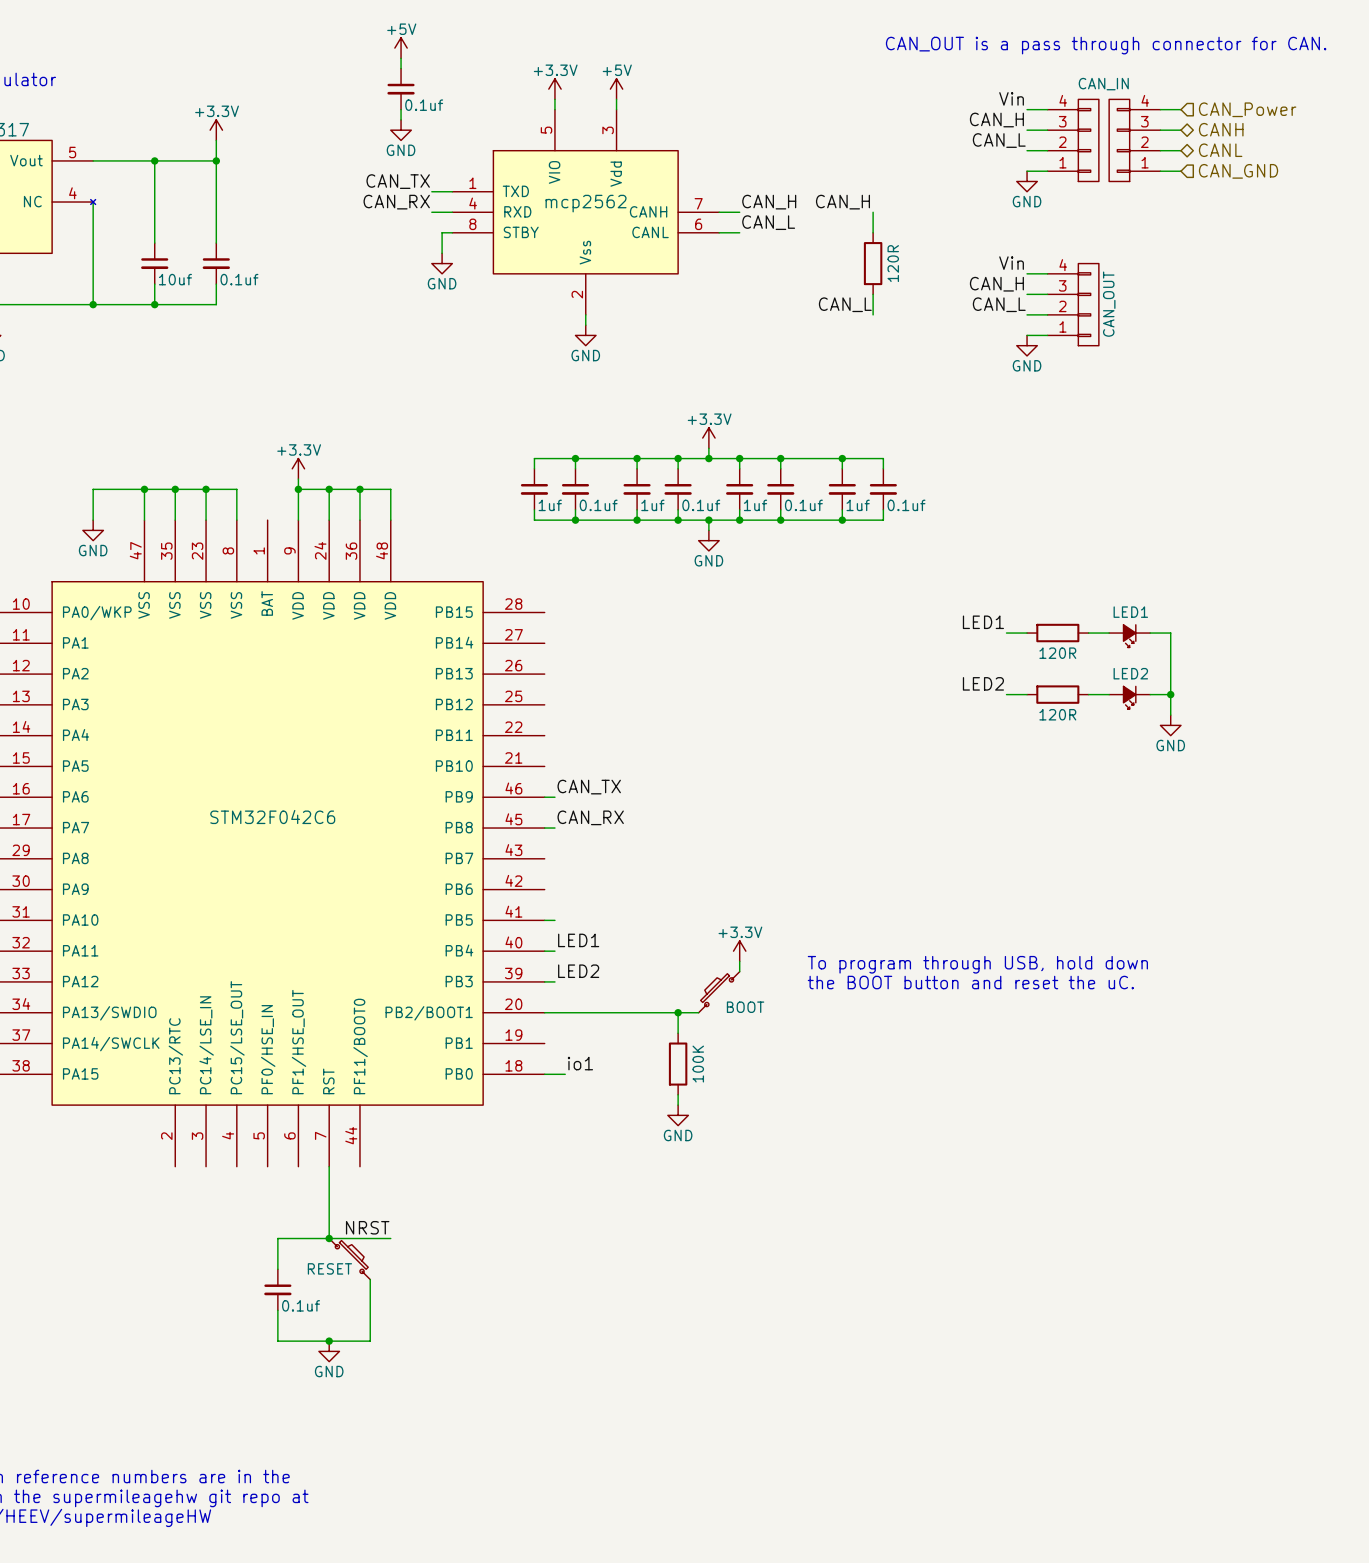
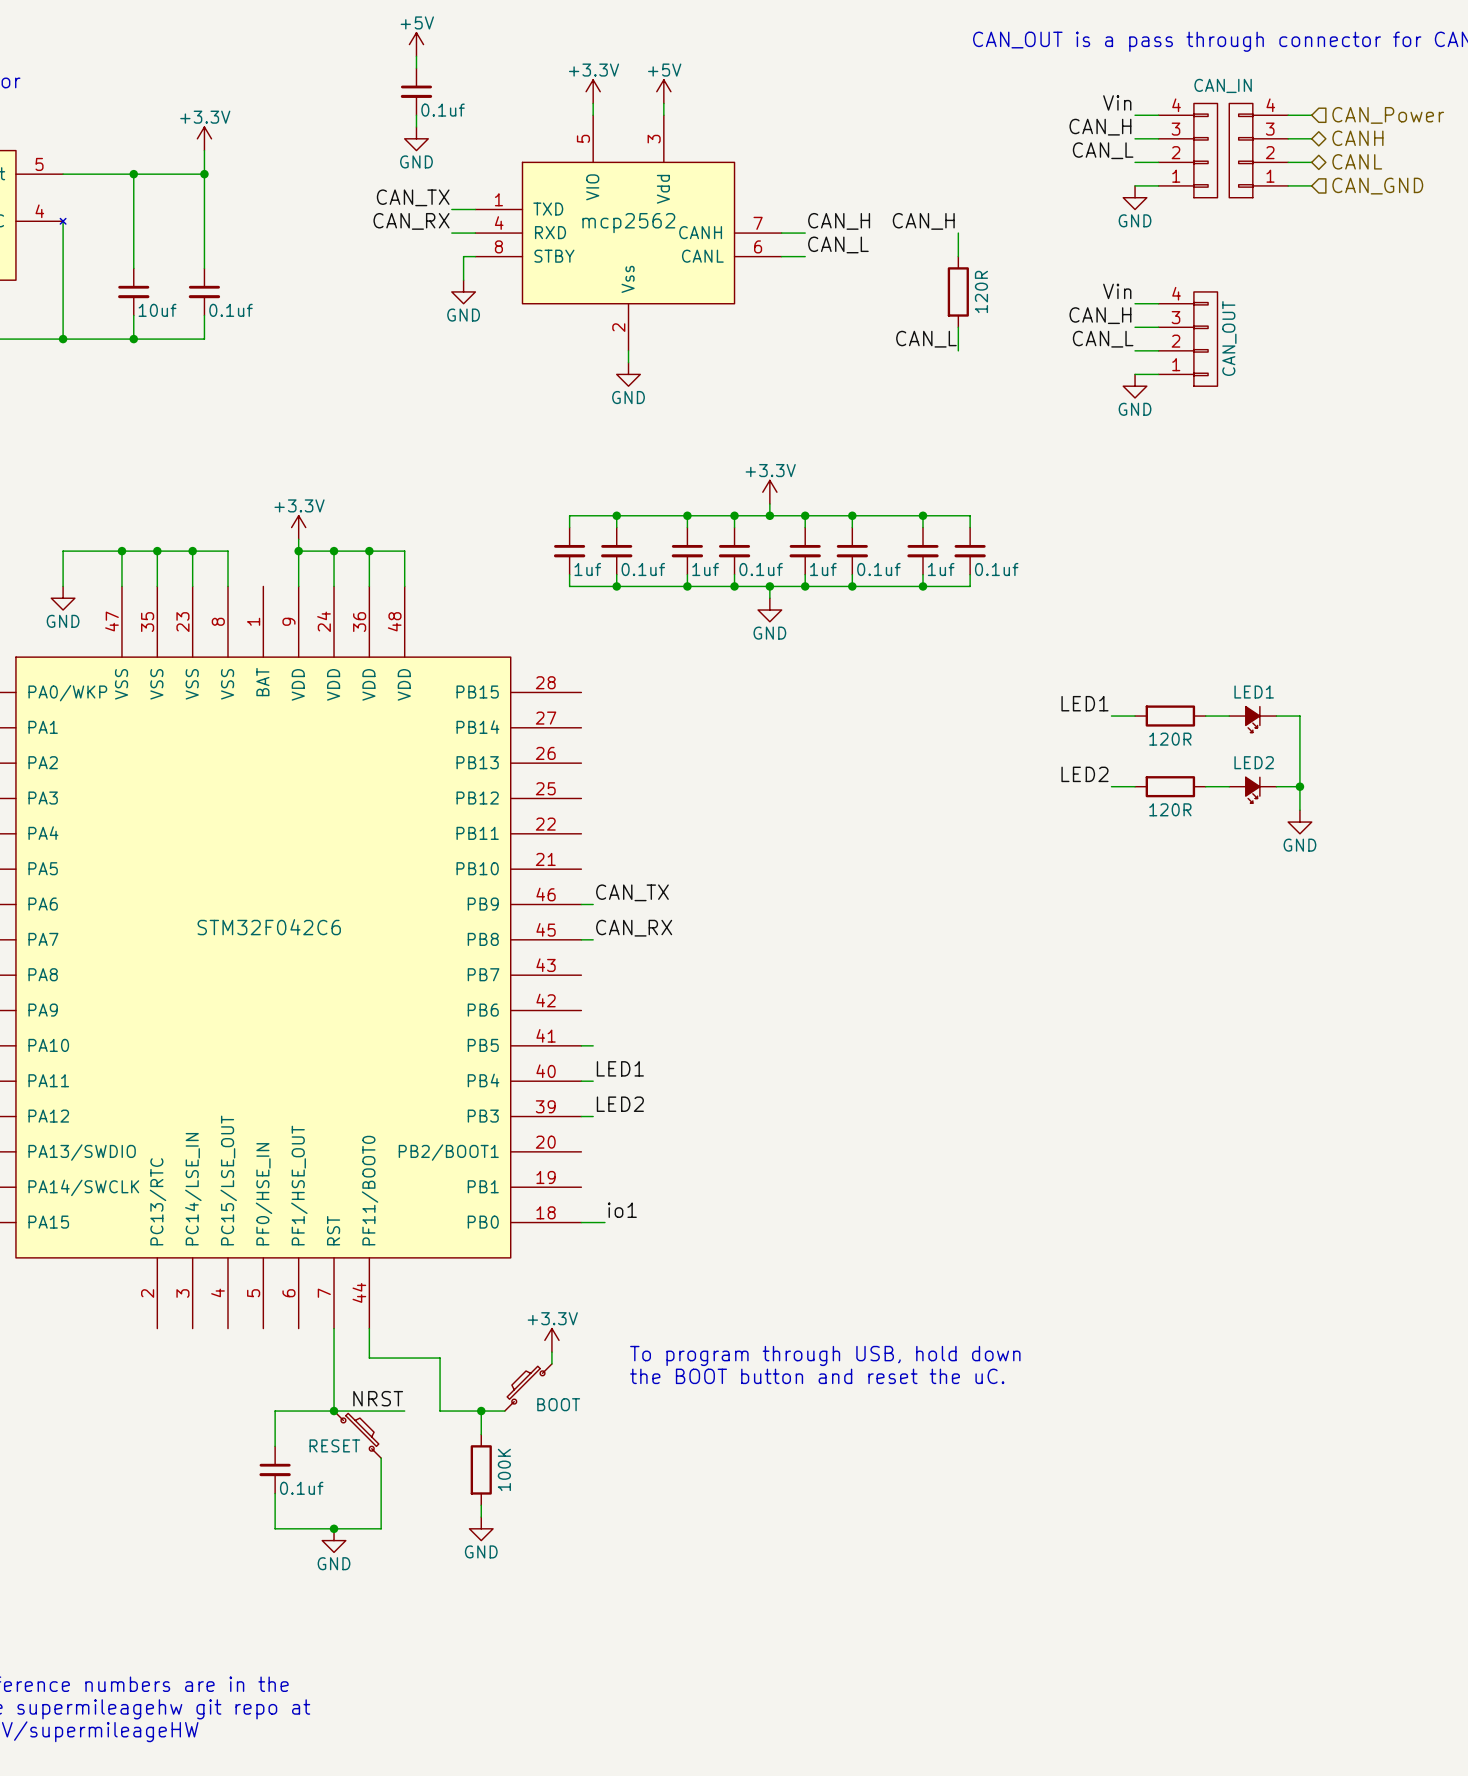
power symbol: +3.3V (739, 951) -> none
wire: (739, 961) (739, 971) -> none
text: To program through USB, hold down (977, 964) -> none
text: the BOOT button and reset the uC. (970, 982) -> none
part: BOOT (719, 992) -> none
wire: (544, 1012) (698, 1012) -> none
wire: (678, 1012) (678, 1033) -> none
junction: (678, 1012) -> none
part: 100K (678, 1064) -> none
wire: (678, 1094) (678, 1105) -> (551, 1352) (551, 1363)
power symbol: GND (678, 1115) -> none
wire: none -> (369, 1328) (369, 1358) (440, 1358) (440, 1411) (504, 1411)
power symbol: none -> +3.3V (551, 1340)
text: none -> To program through USB, hold down (825, 1355)
text: none -> the BOOT button and reset the uC. (817, 1376)
part: none -> BOOT (528, 1387)
wire: none -> (481, 1411) (481, 1434)
junction: none -> (481, 1411)
part: none -> 100K (481, 1469)
wire: none -> (481, 1505) (481, 1517)
power symbol: none -> GND (481, 1528)

